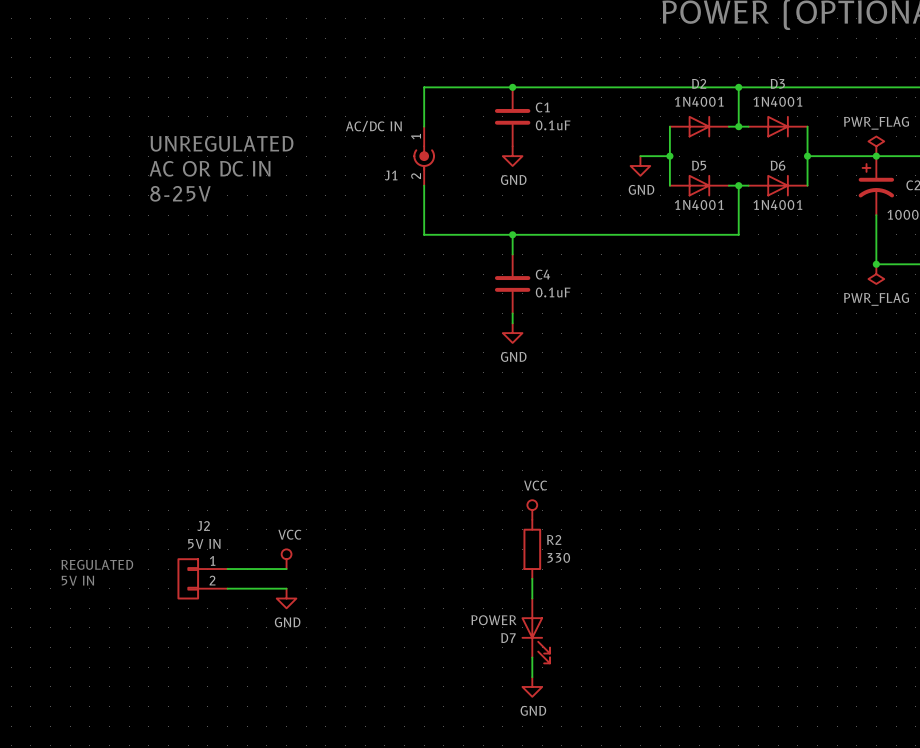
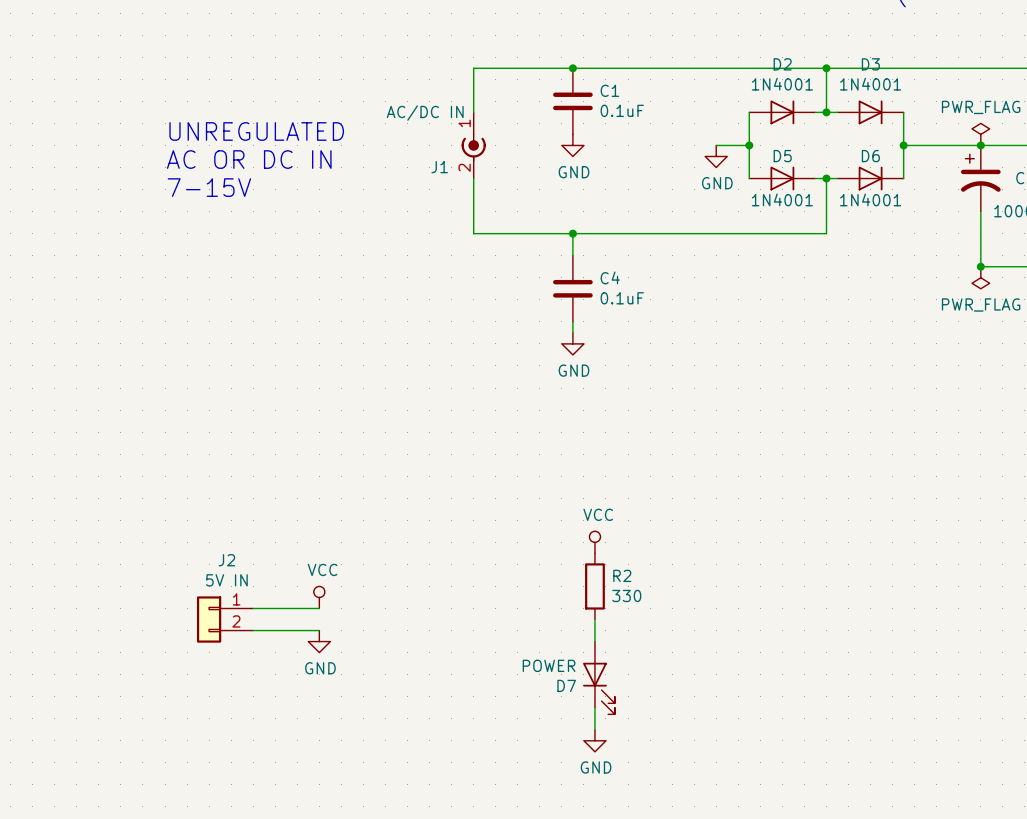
text: 8-25V (180, 193) -> 7-15V (209, 187)
text: REGULATED (97, 564) -> none
text: 5V IN (77, 580) -> none

